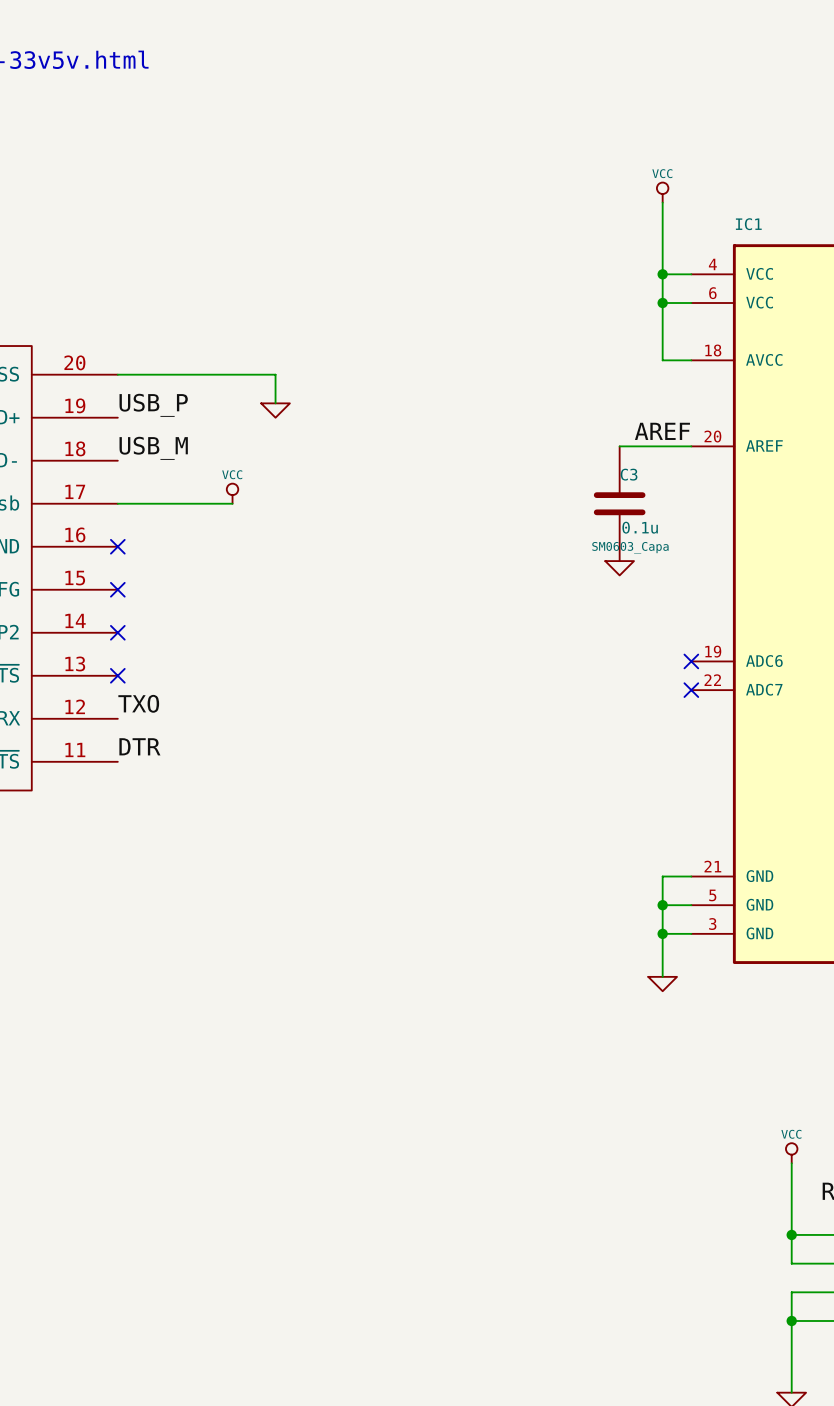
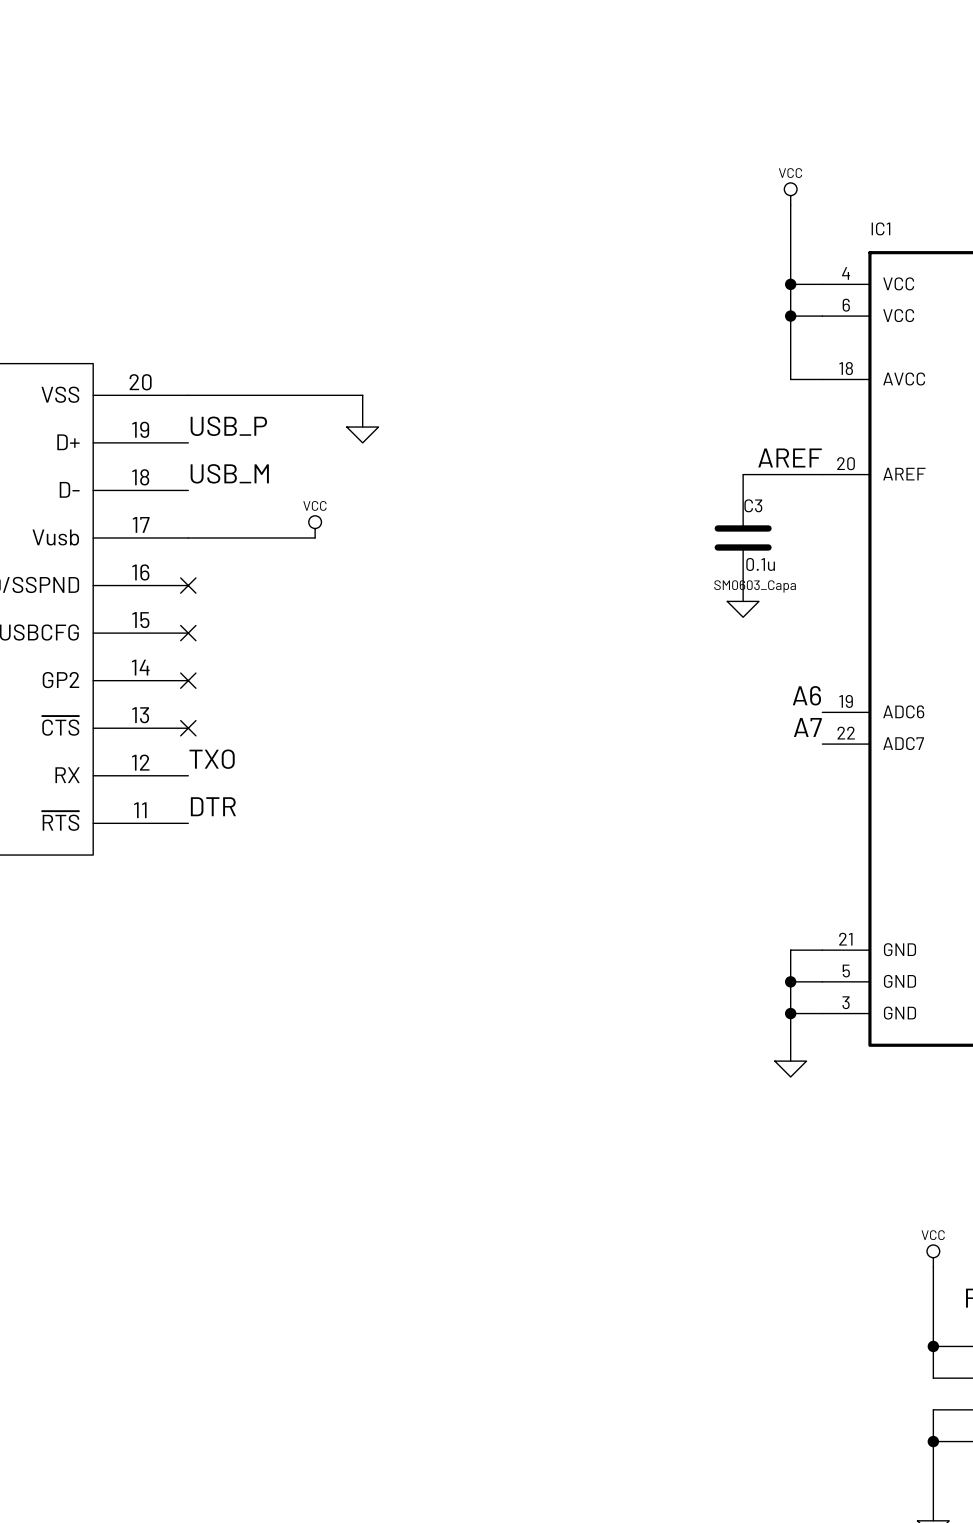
label: none -> A6 (806, 695)
no-connect mark: (691, 661) -> none
label: none -> A7 (807, 727)
no-connect mark: (691, 690) -> none

